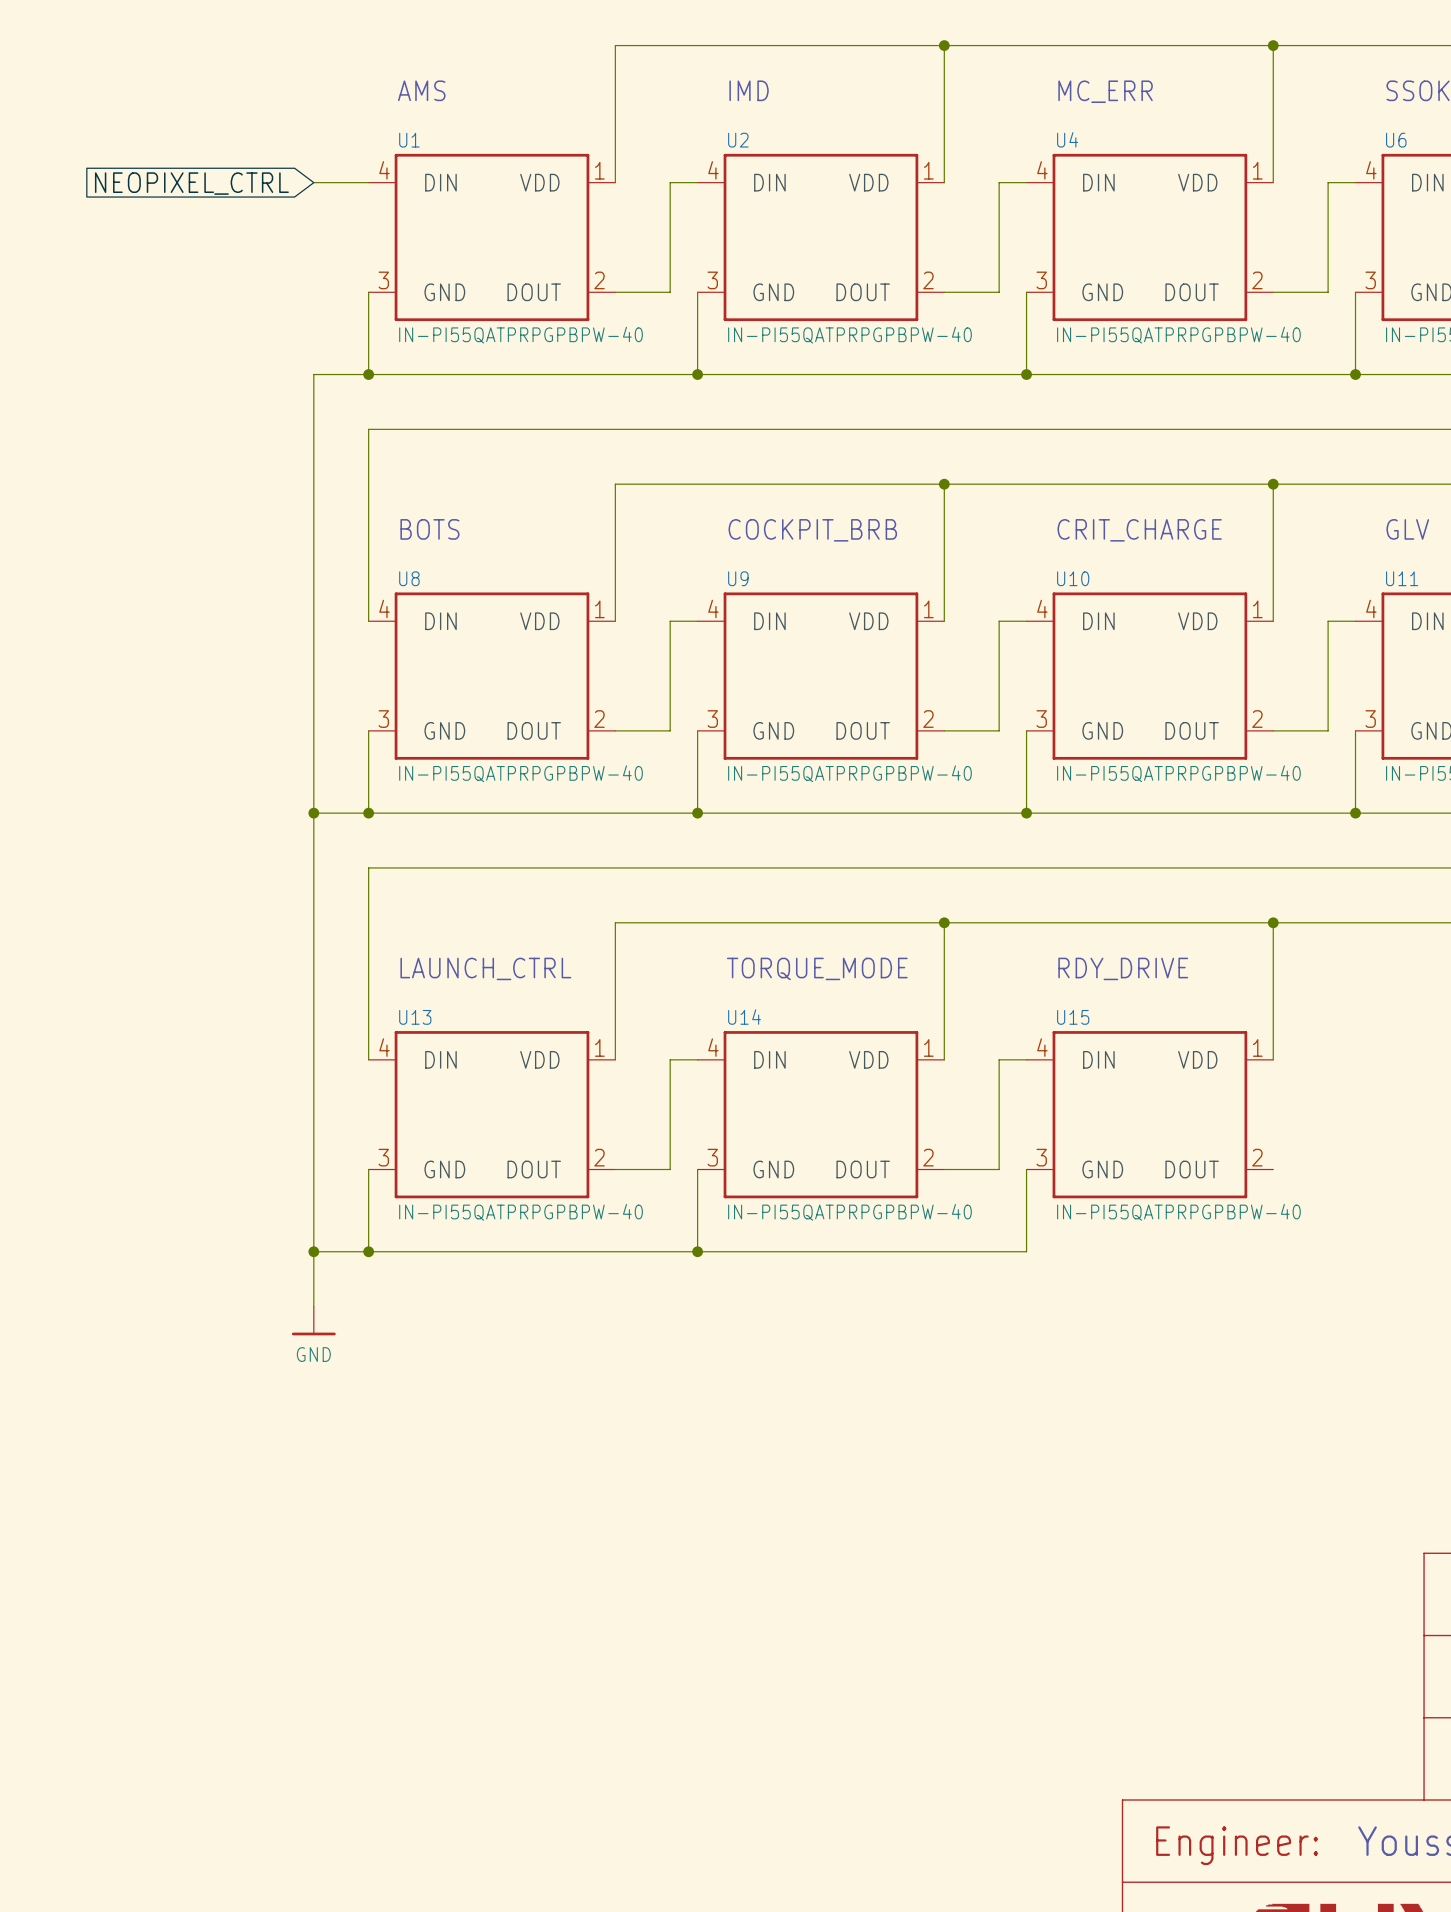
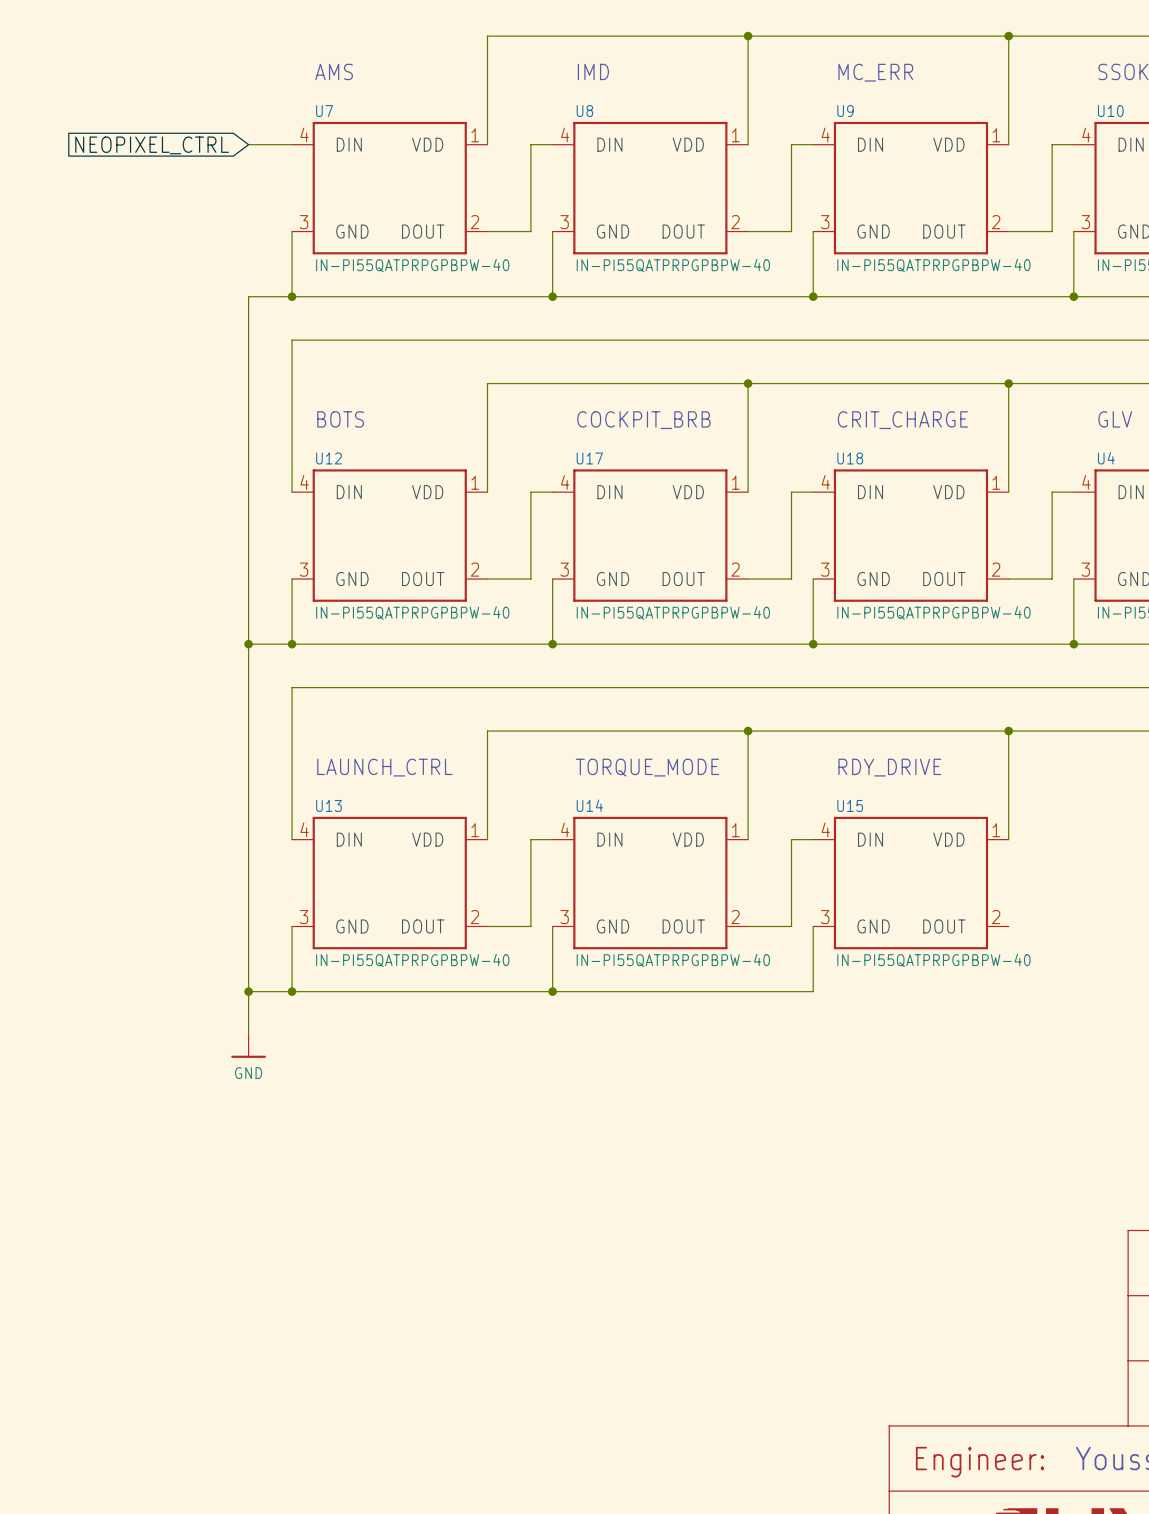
U4 name: U4 (1067, 139) -> U9 (845, 111)
U1 name: U1 (409, 140) -> U7 (324, 111)
U2 name: U2 (738, 140) -> U8 (584, 111)
U6 name: U6 (1396, 140) -> U10 (1110, 111)
U8 name: U8 (409, 578) -> U12 (328, 458)
U9 name: U9 (738, 578) -> U17 (589, 458)
U10 name: U10 (1073, 578) -> U18 (850, 458)
U11 name: U11 (1402, 578) -> U4 (1106, 458)

